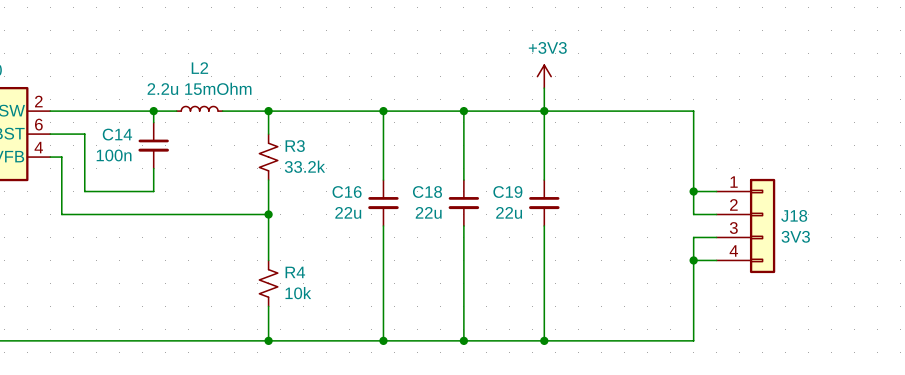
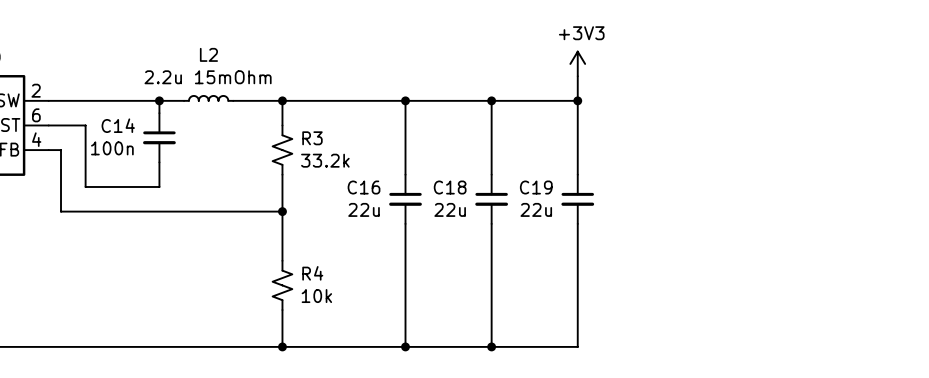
wire: (544, 111) (693, 111) (693, 214) (716, 214) -> none
wire: (693, 191) (716, 191) -> none
junction: (693, 191) -> none
J18: 3V3 (745, 225) -> none
wire: (716, 237) (693, 237) (693, 340) (544, 340) -> none
wire: (693, 260) (716, 260) -> none
junction: (693, 260) -> none
junction: (544, 340) -> none

